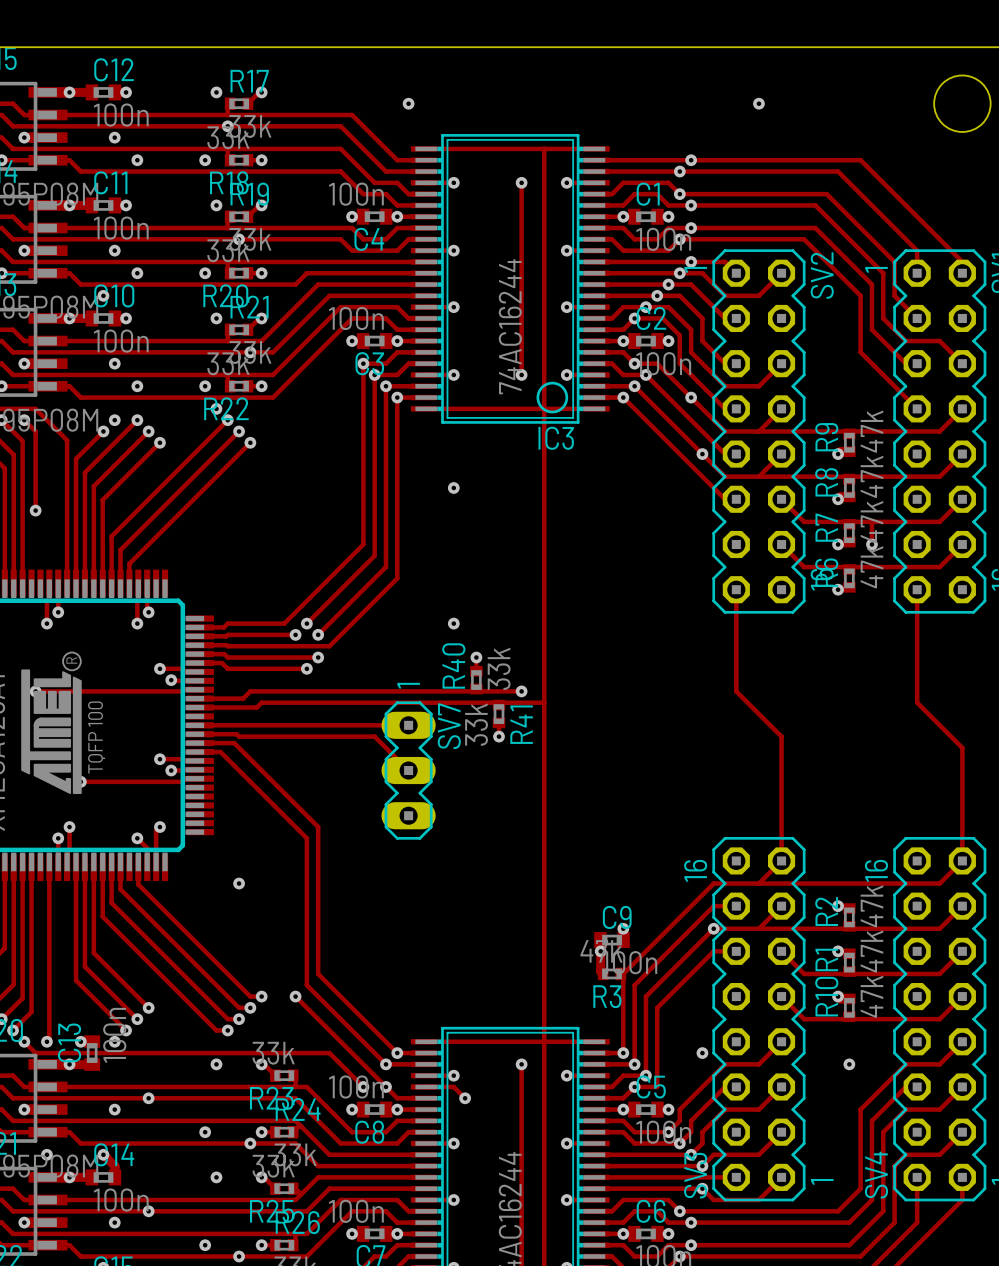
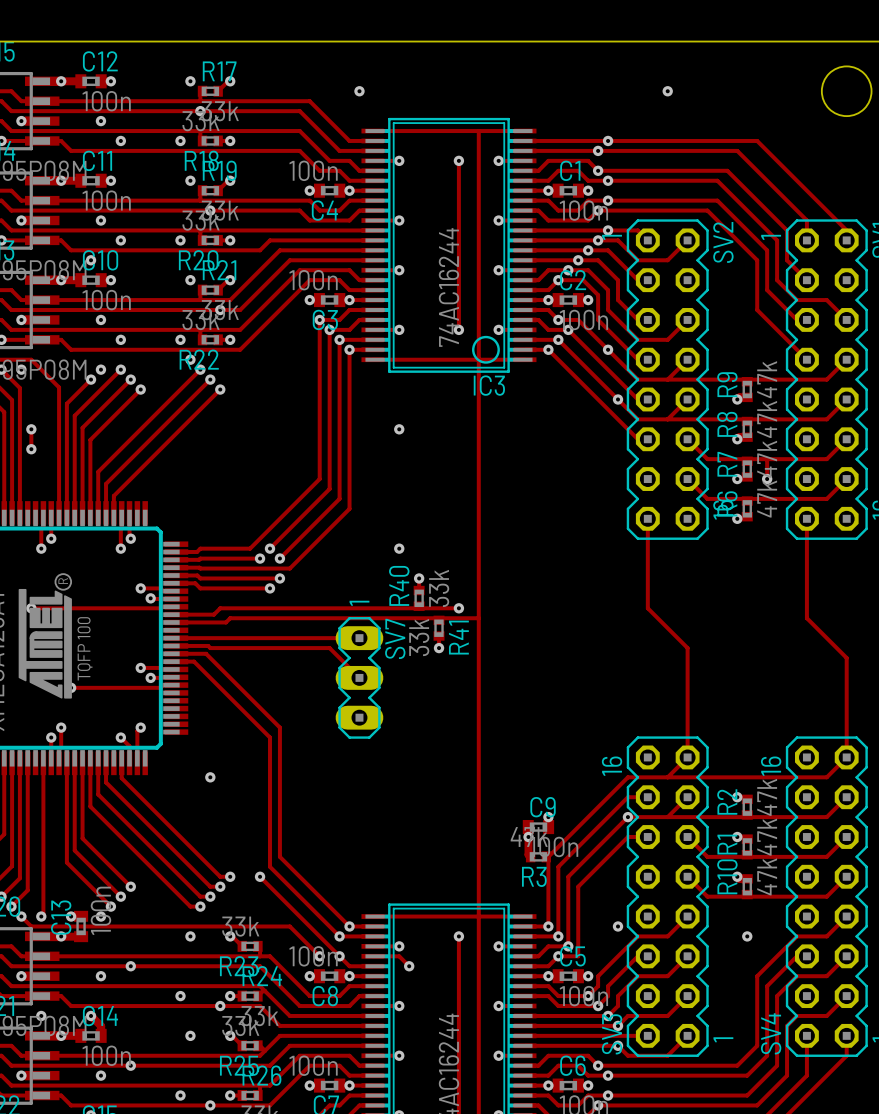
track: (24, 420) (35, 431) (35, 487) -> none
via: none -> (31, 429)

